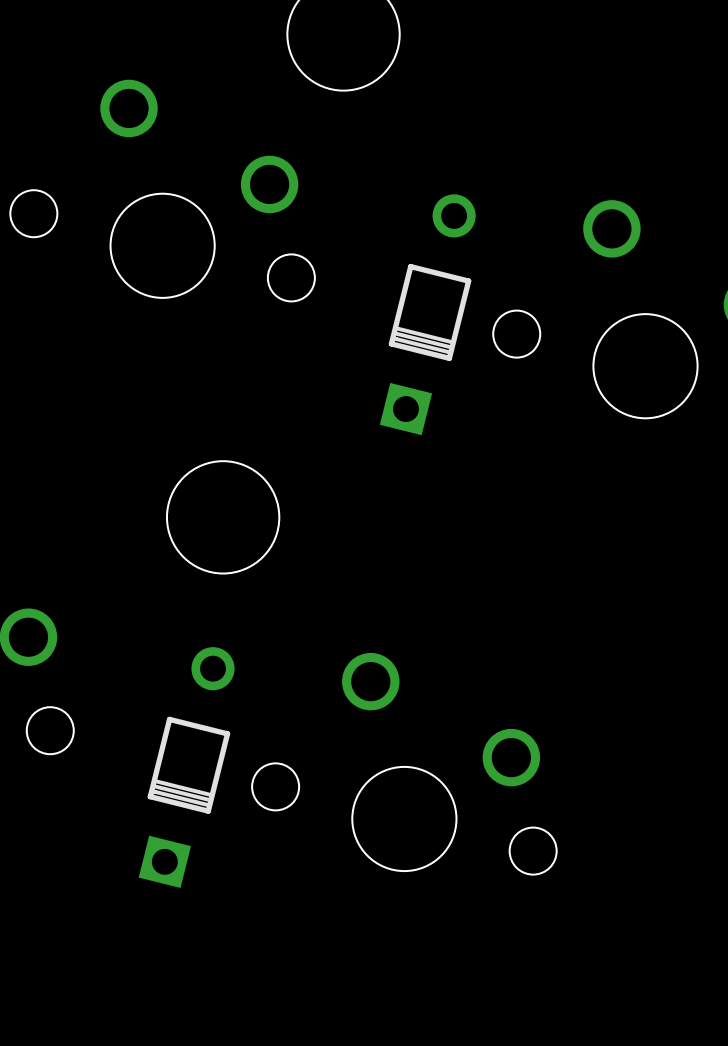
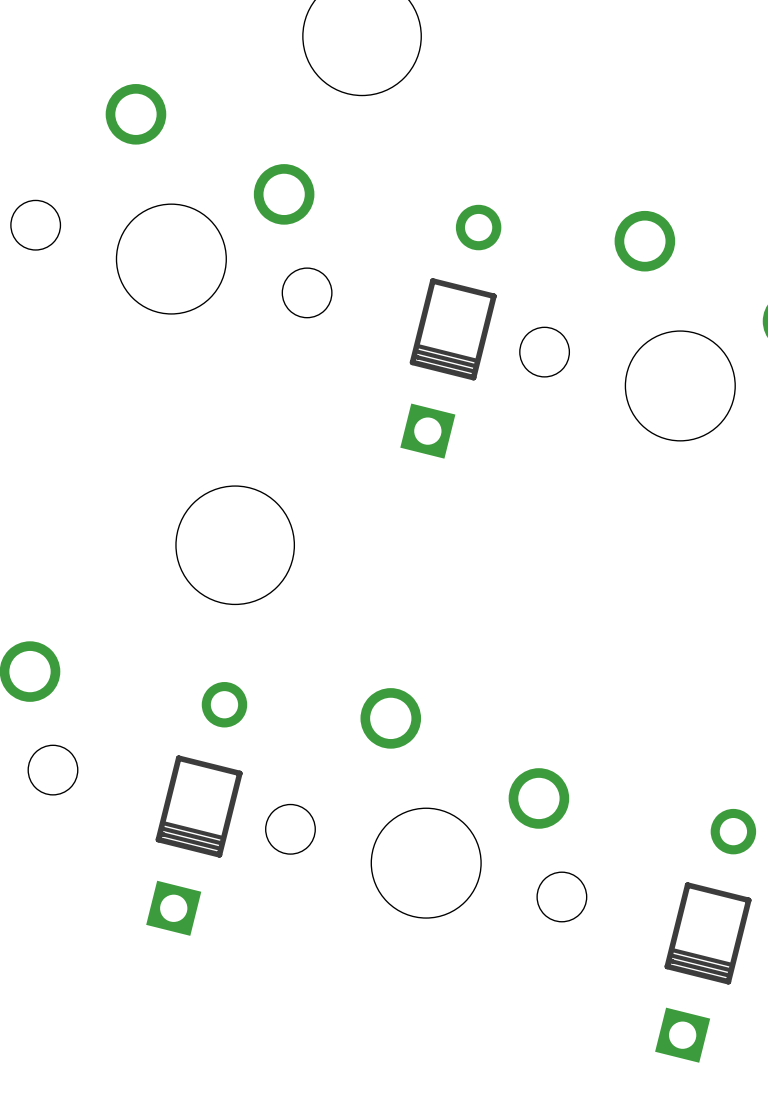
part: none -> (705, 935)

